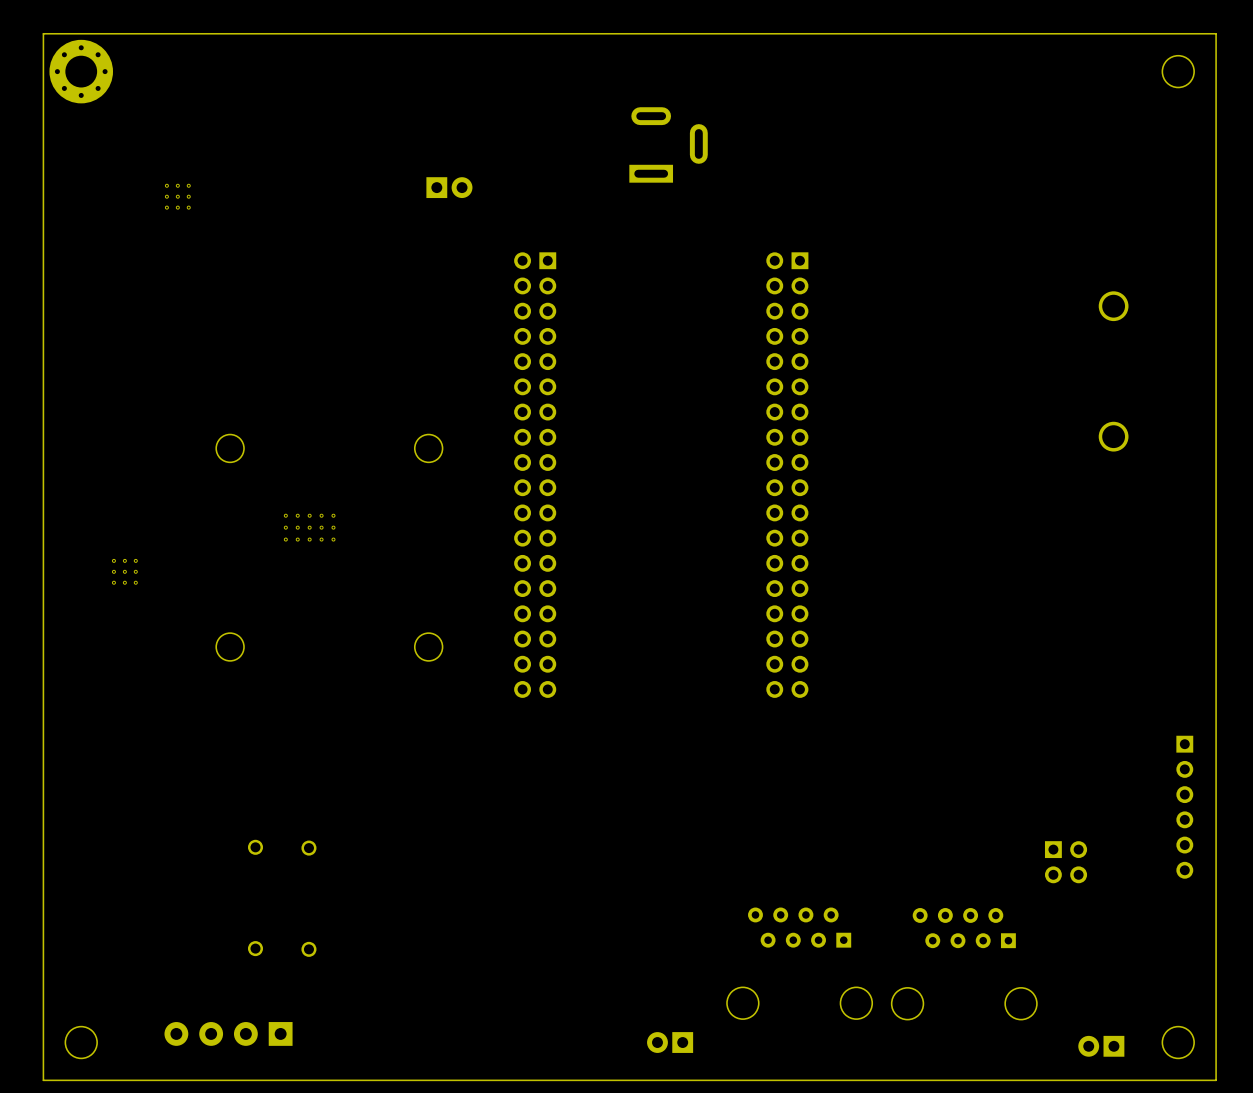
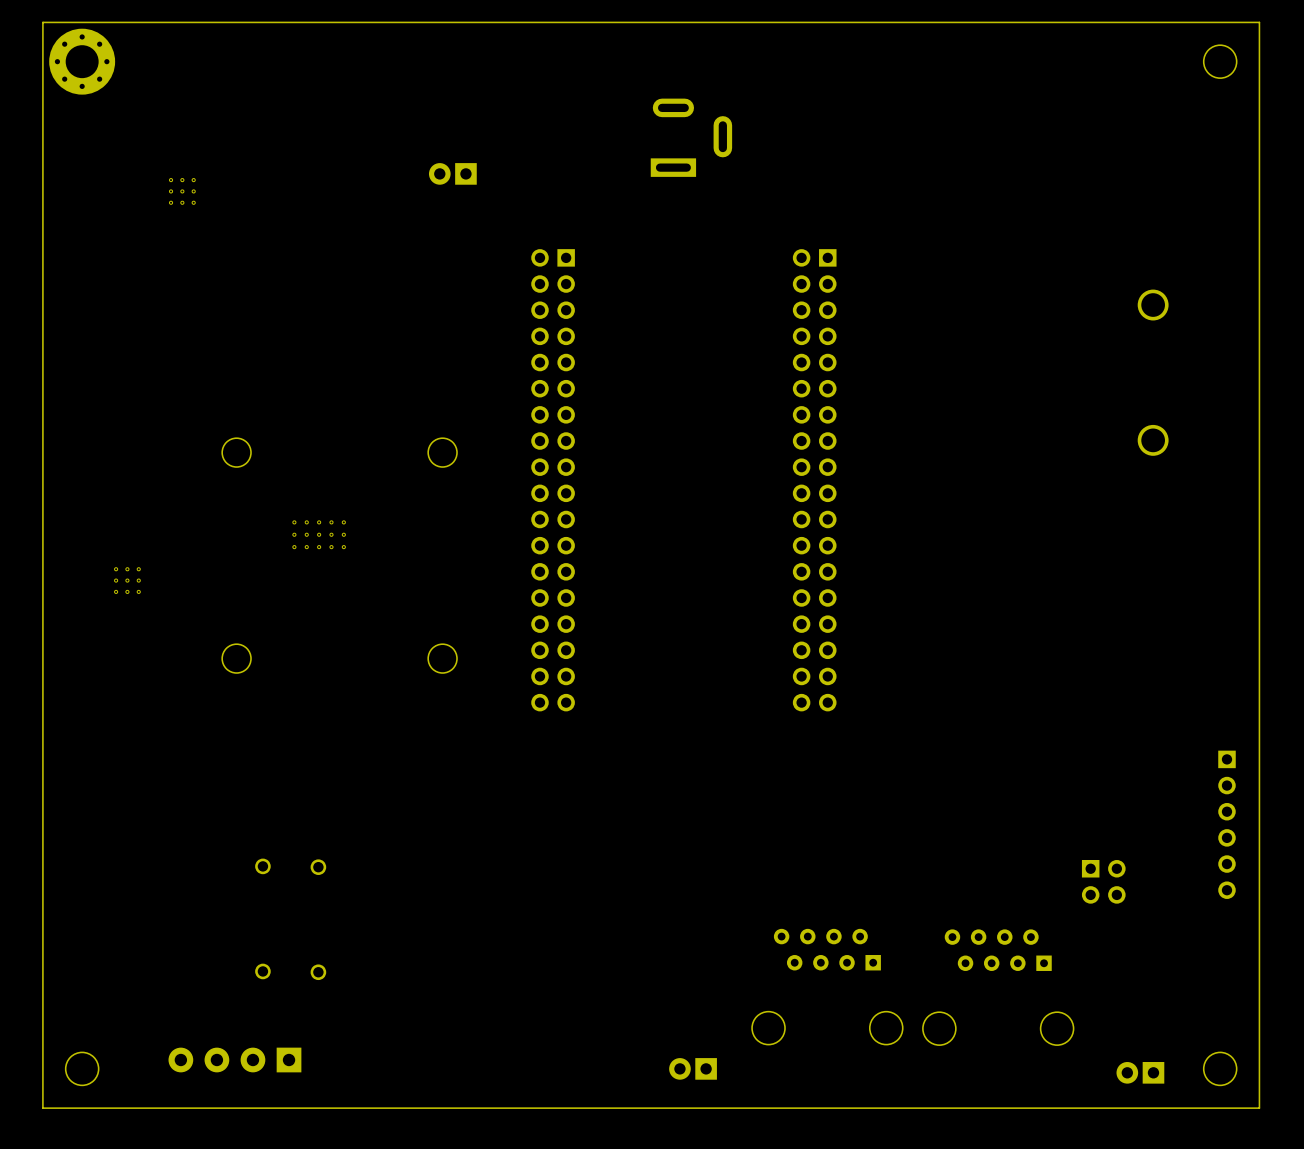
part rotation: 0° (449, 187) -> 180° (452, 173)

